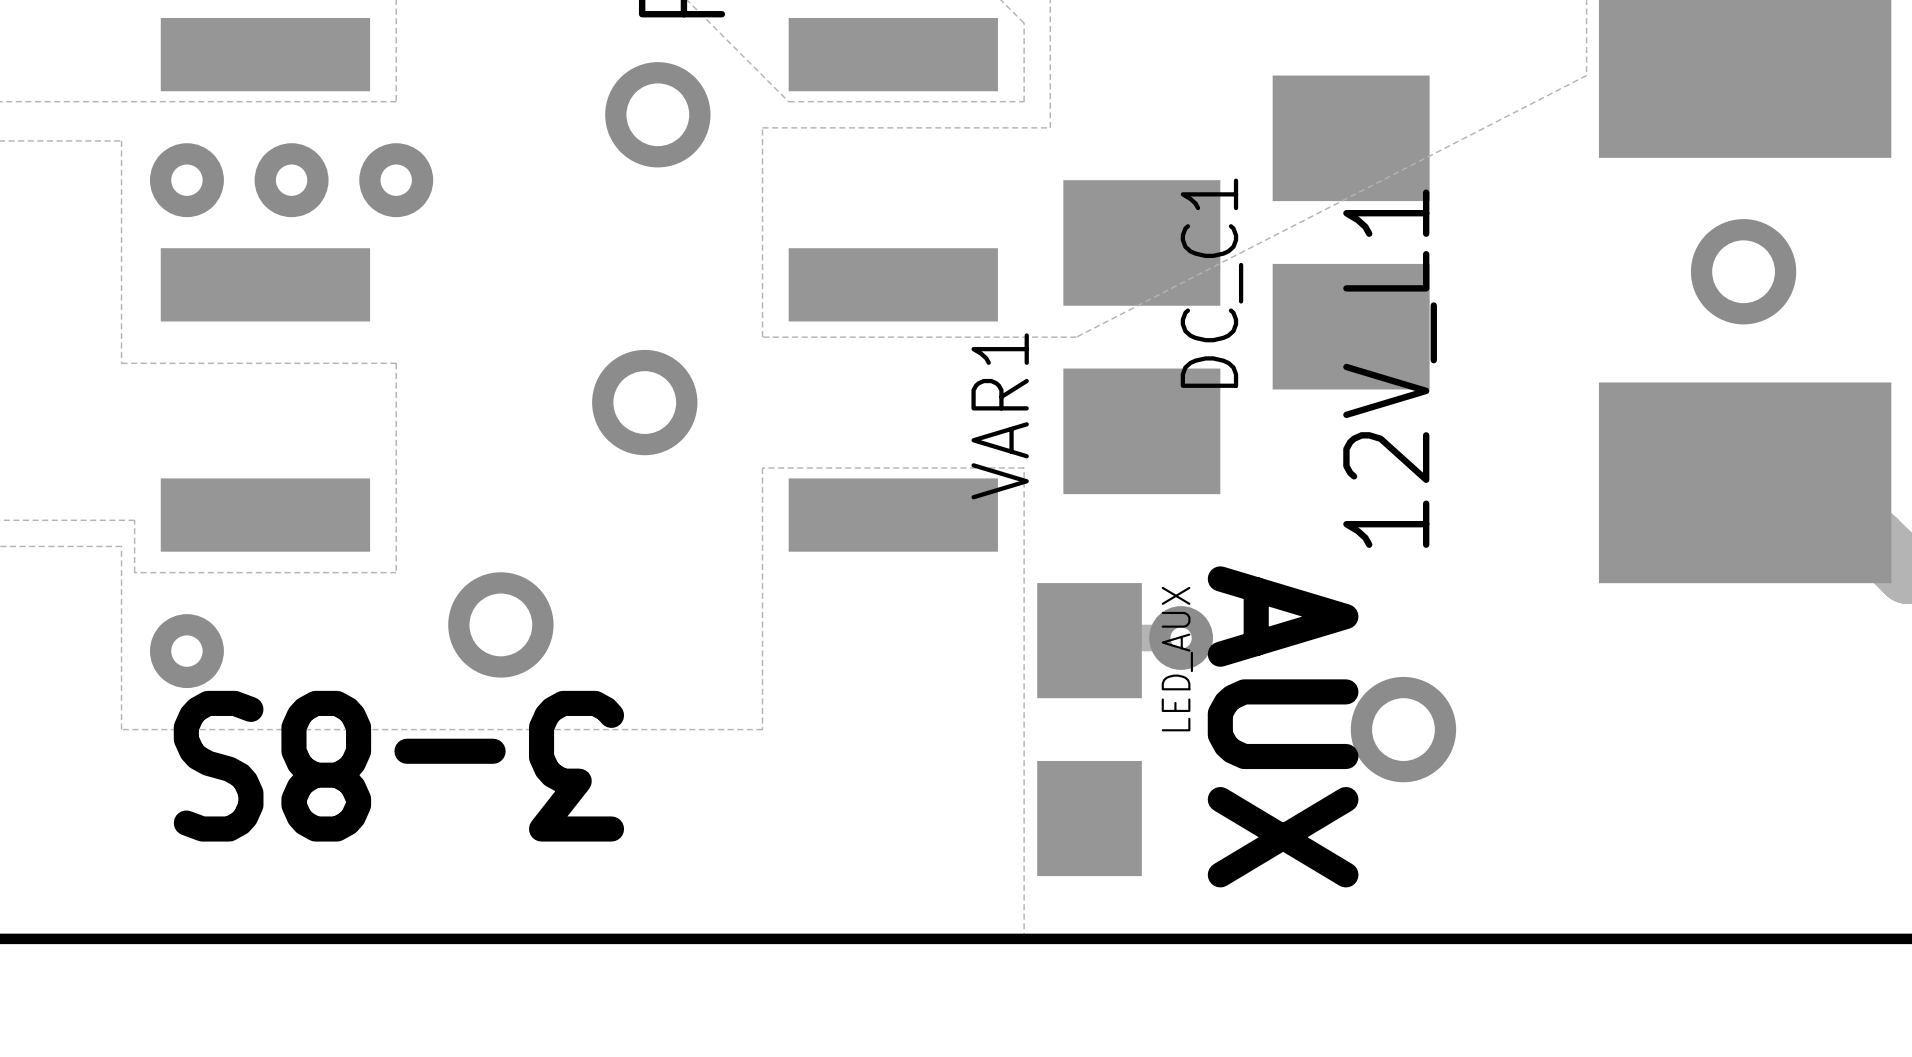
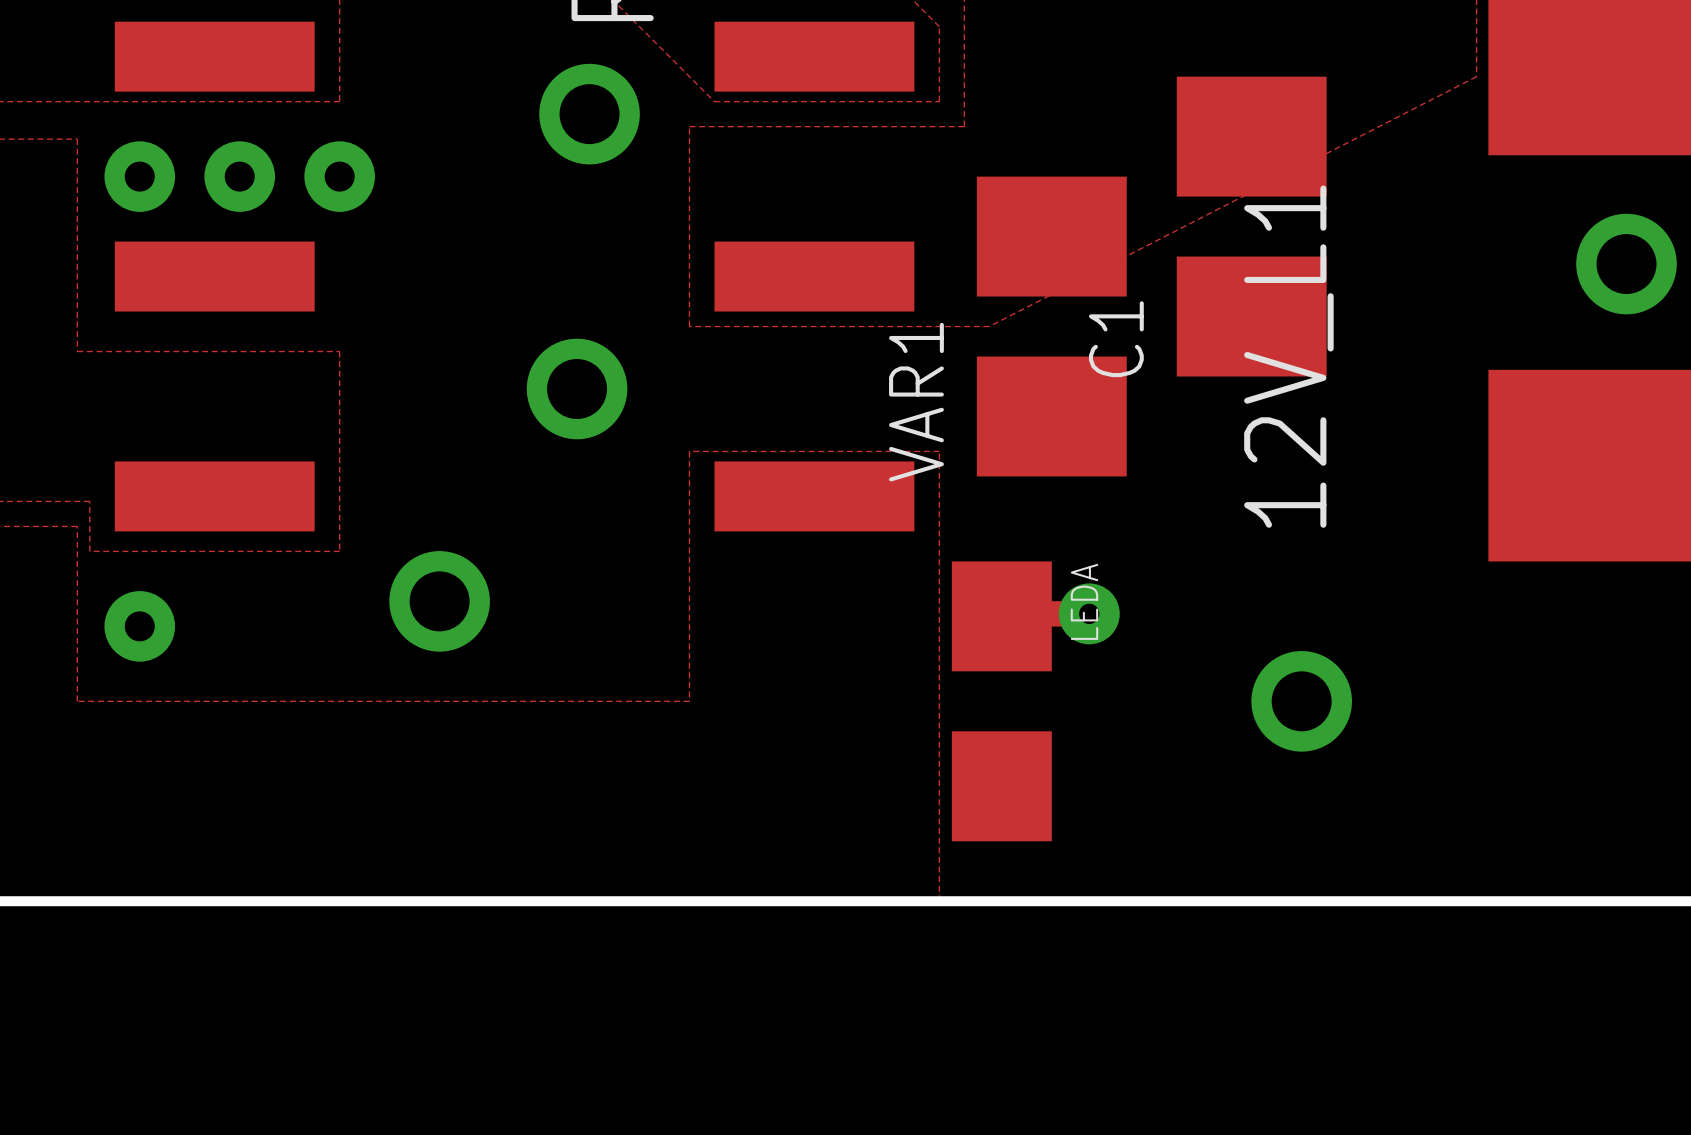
DC_C1 name: DC_C1 (1211, 283) -> C1 (1116, 339)
LED_AUX name: LED_AUX (1177, 659) -> LEDA (1084, 601)
text: AUX (1283, 726) -> none
text: 3-8S (398, 766) -> none

